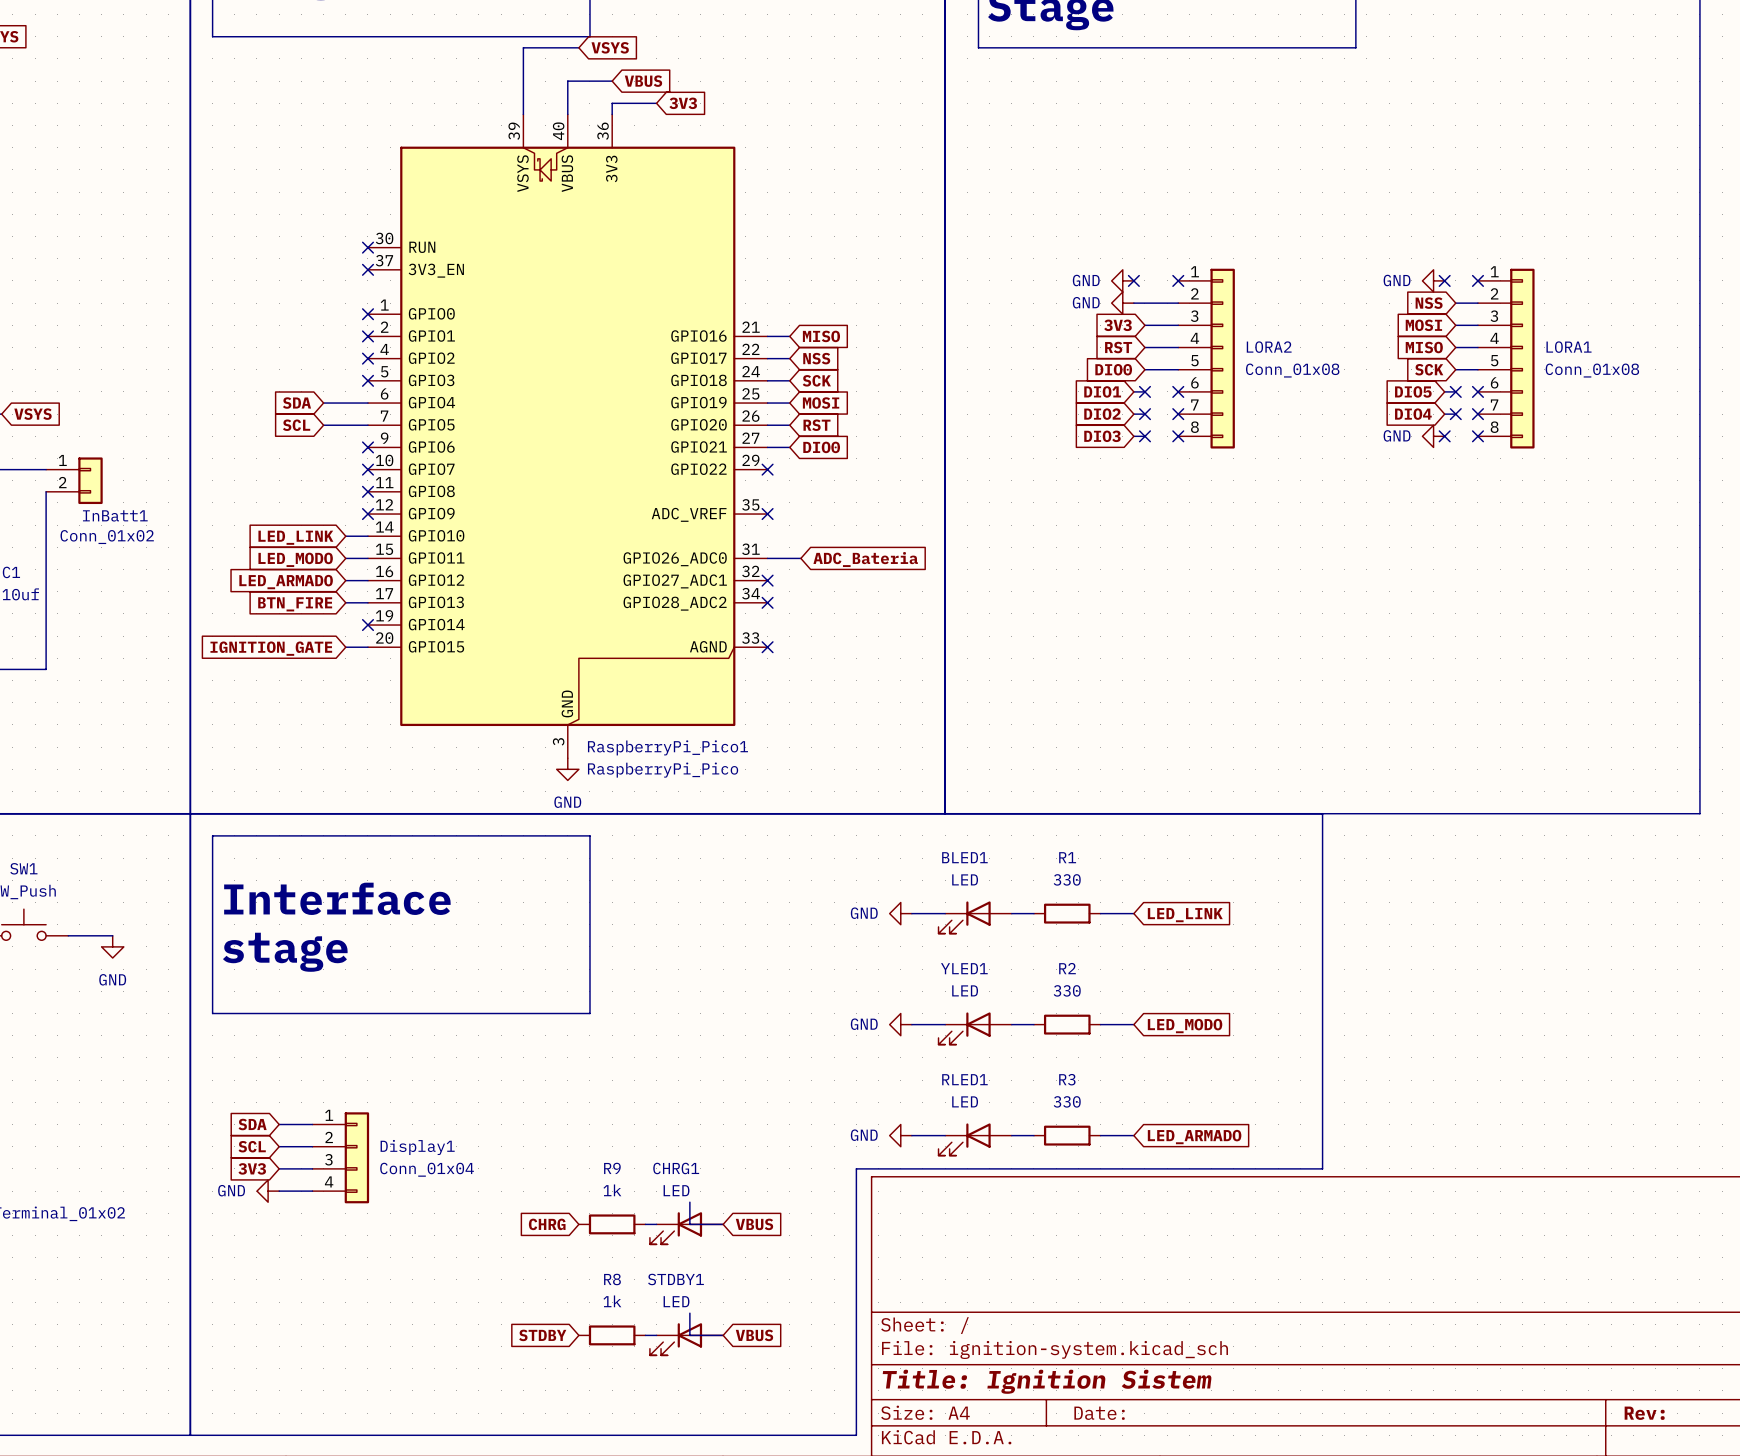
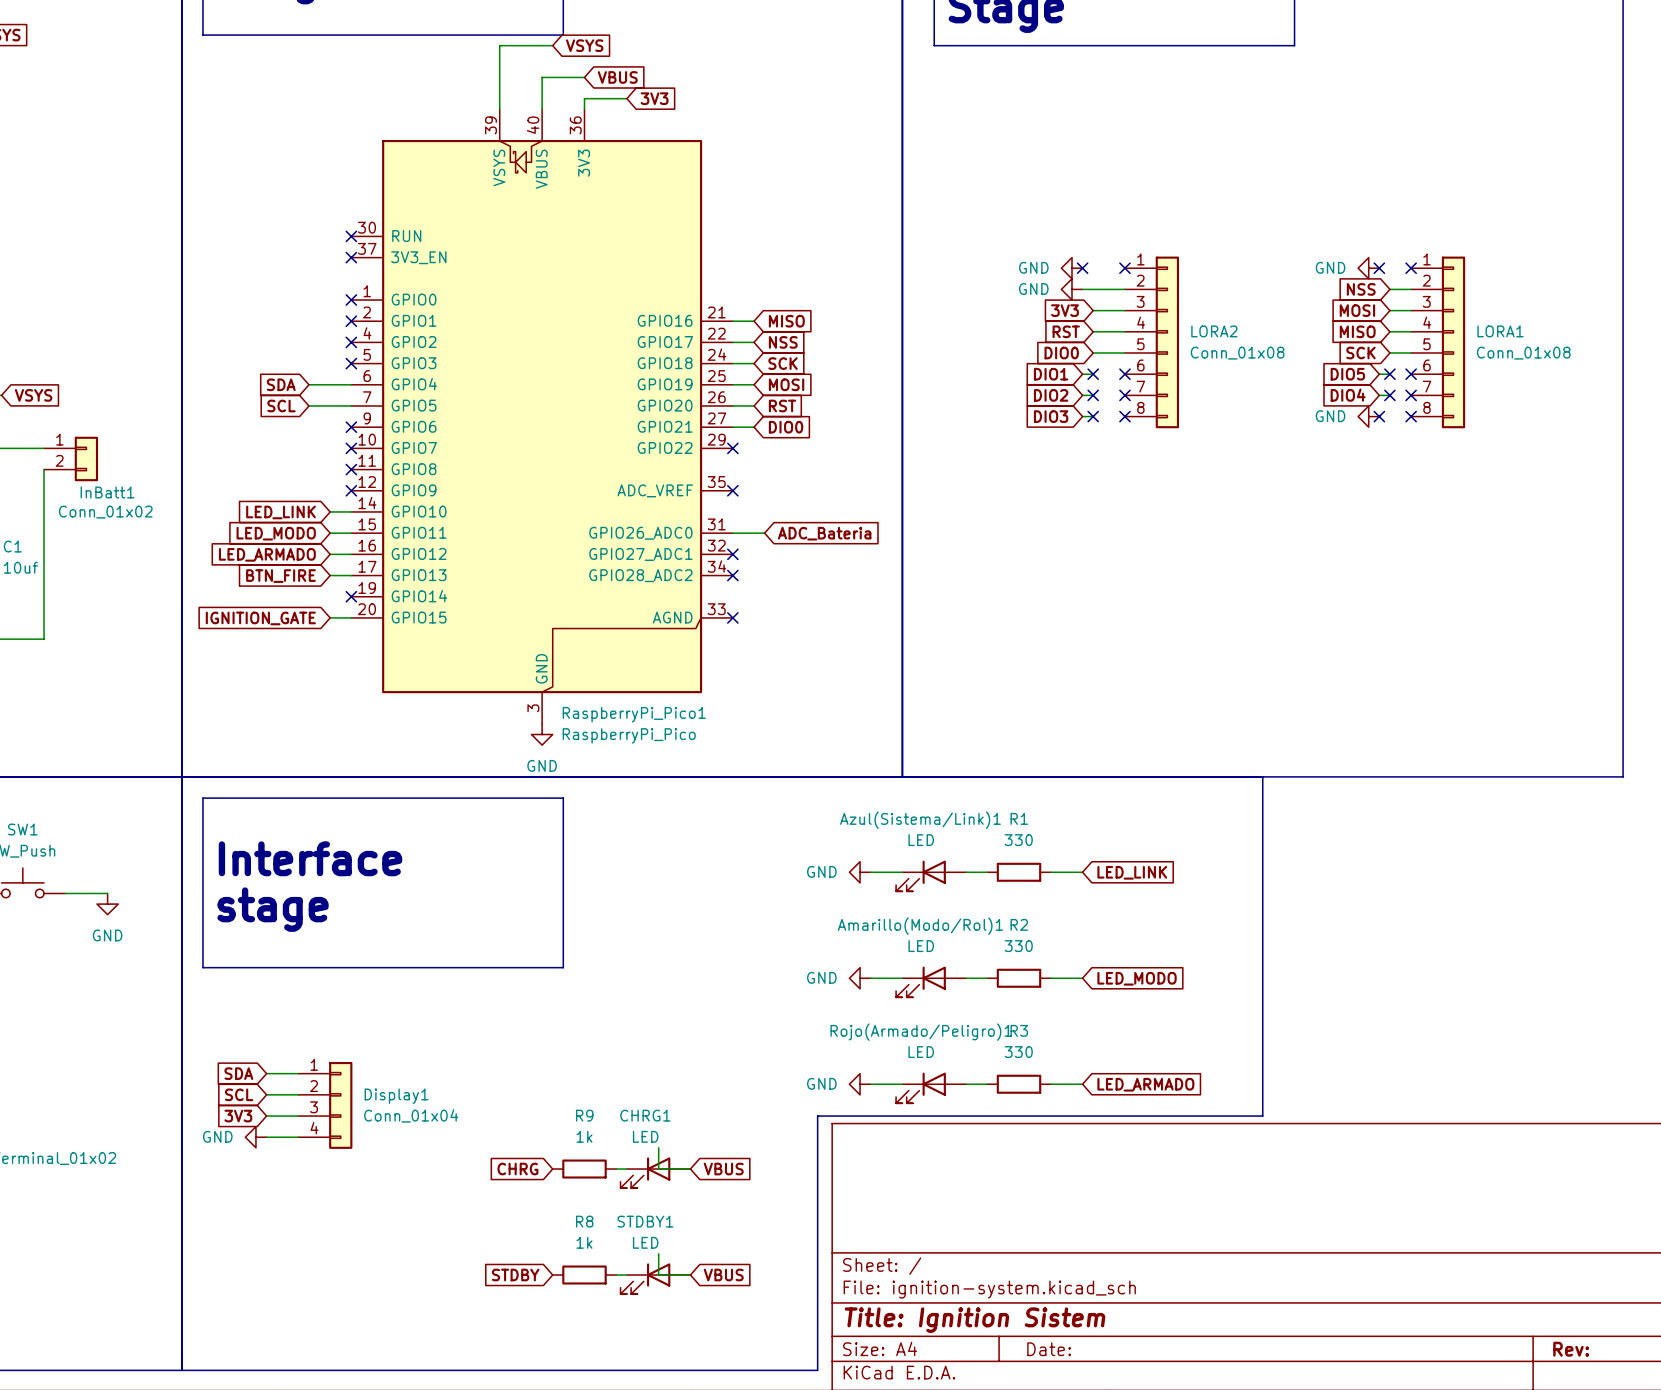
BLED1 name: BLED1 (964, 857) -> Azul(Sistema/Link)1 (920, 820)
YLED1 name: YLED1 (964, 968) -> Amarillo(Modo/Rol)1 (920, 926)
RLED1 name: RLED1 (964, 1079) -> Rojo(Armado/Peligro)1 (921, 1032)

